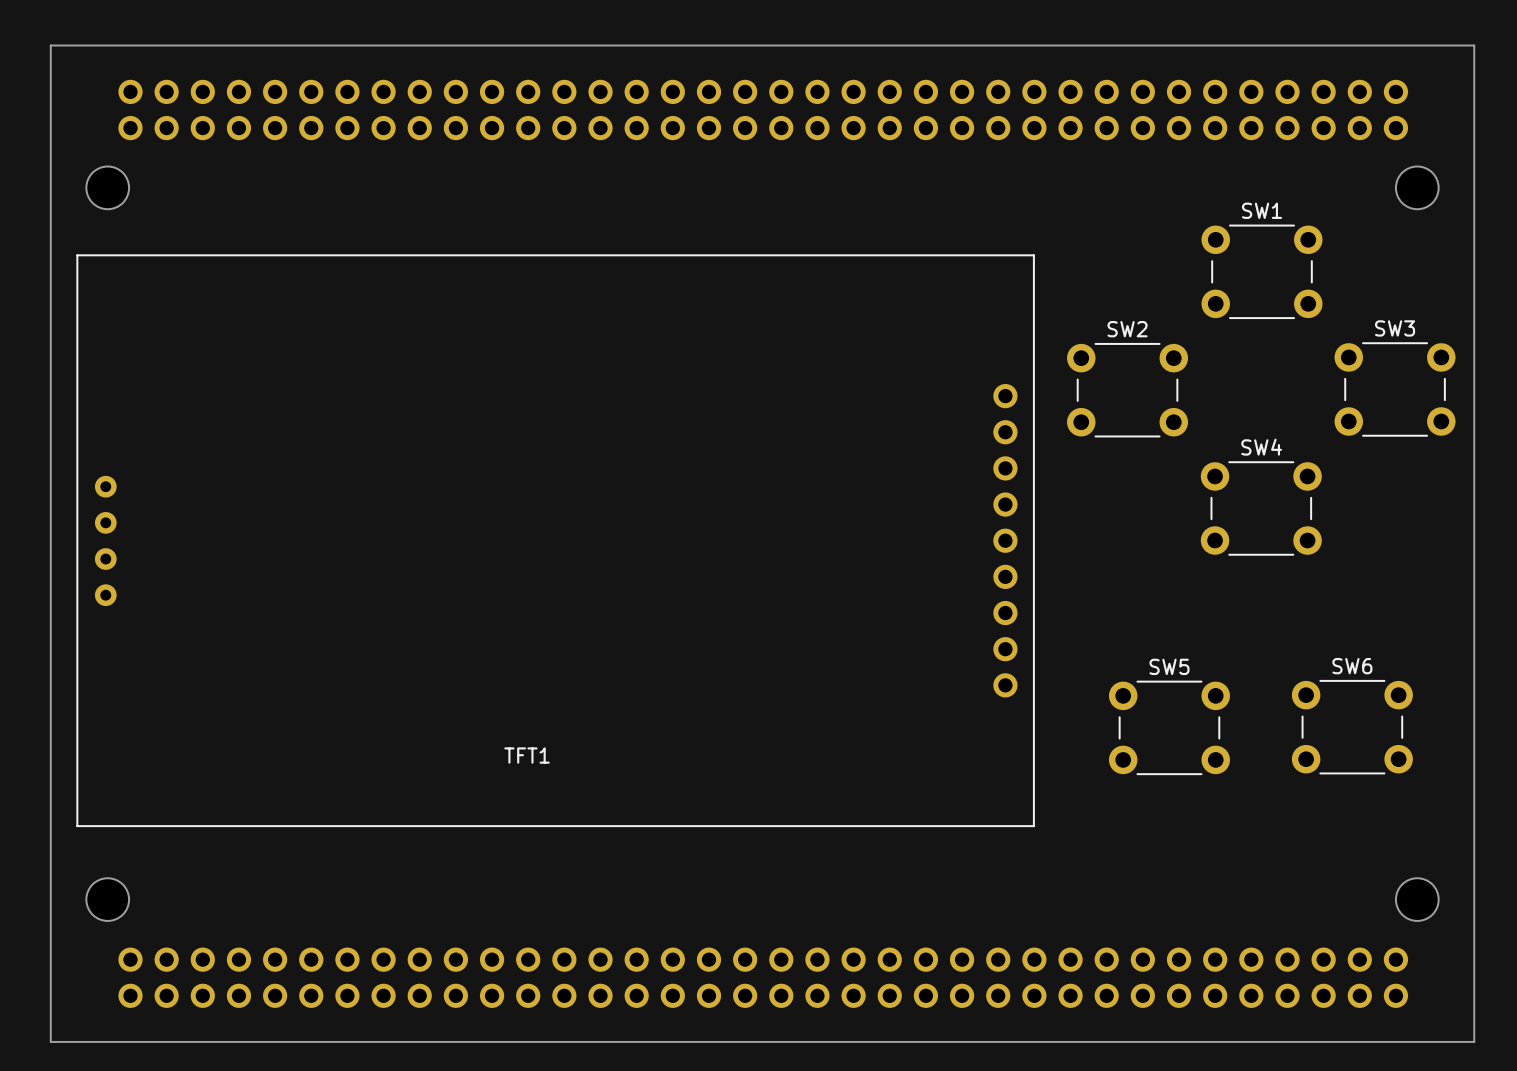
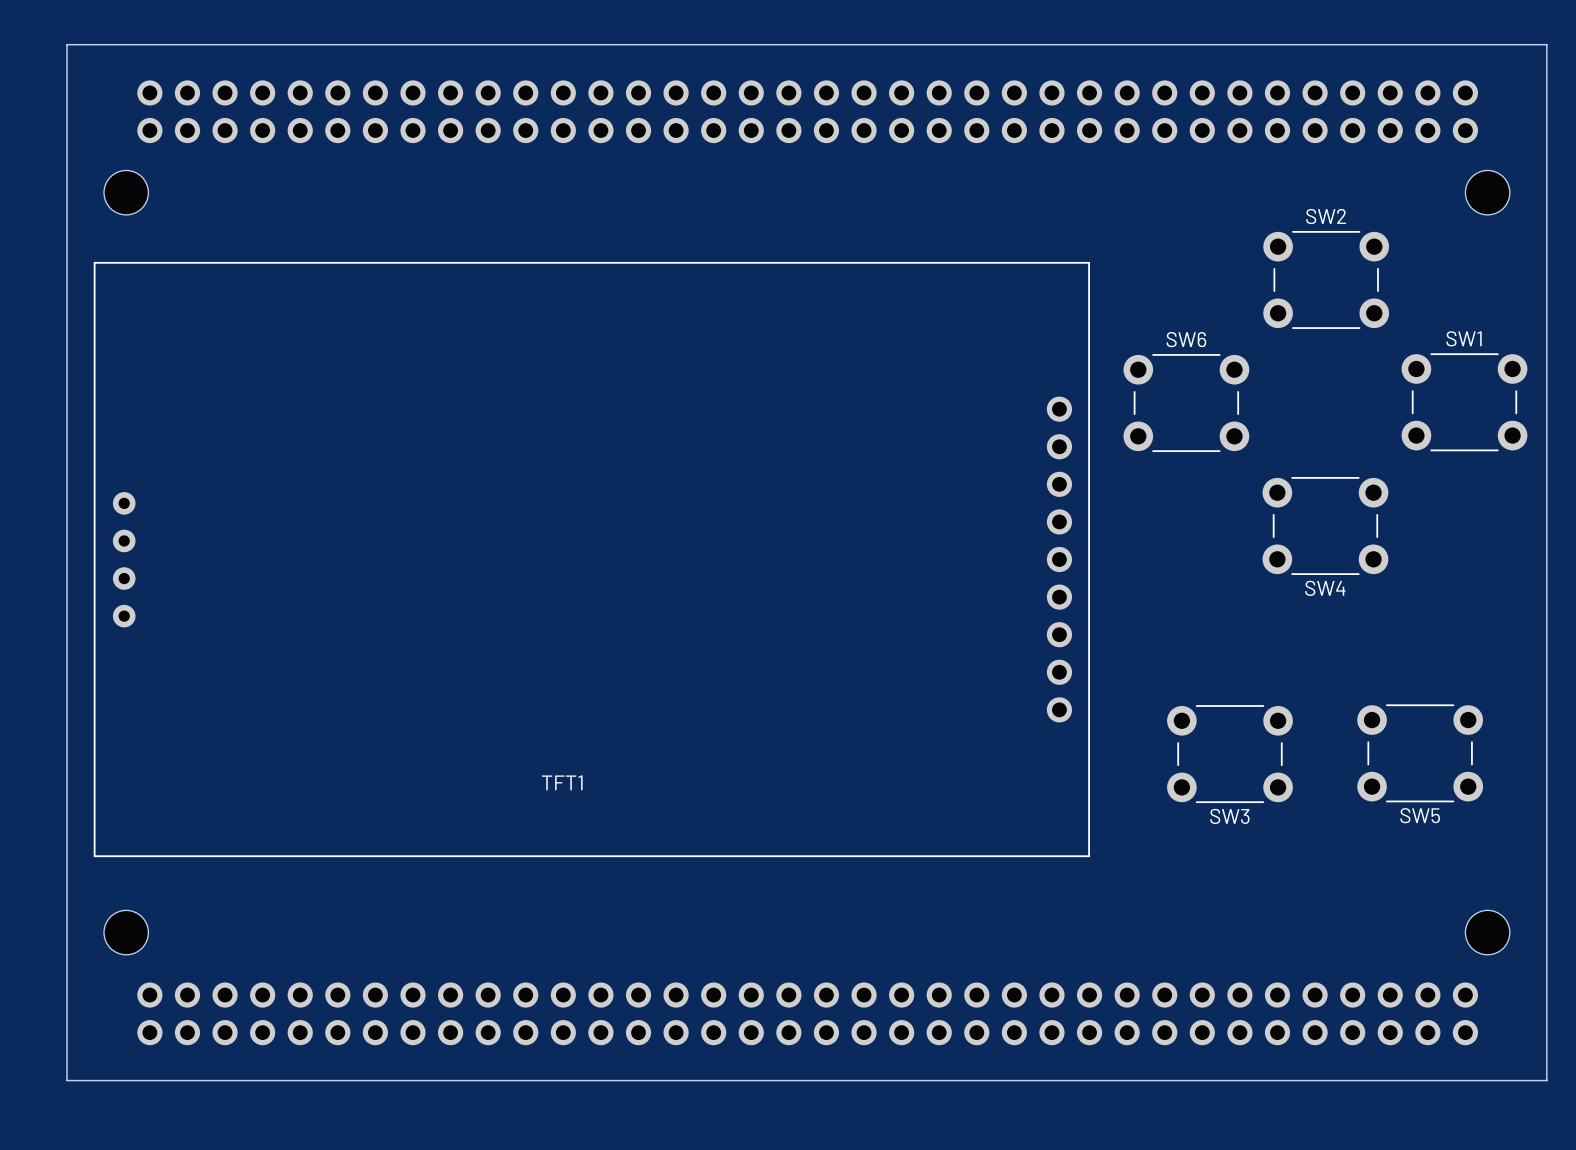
SW1 name: SW1 (1262, 210) -> SW2 (1326, 216)
SW3 name: SW3 (1395, 328) -> SW1 (1464, 338)
SW2 name: SW2 (1127, 329) -> SW6 (1186, 339)
SW4 name position: SW4 (1261, 447) -> SW4 (1325, 588)
SW5 name: SW5 (1169, 666) -> SW3 (1229, 816)
SW6 name: SW6 (1352, 666) -> SW5 (1420, 815)

